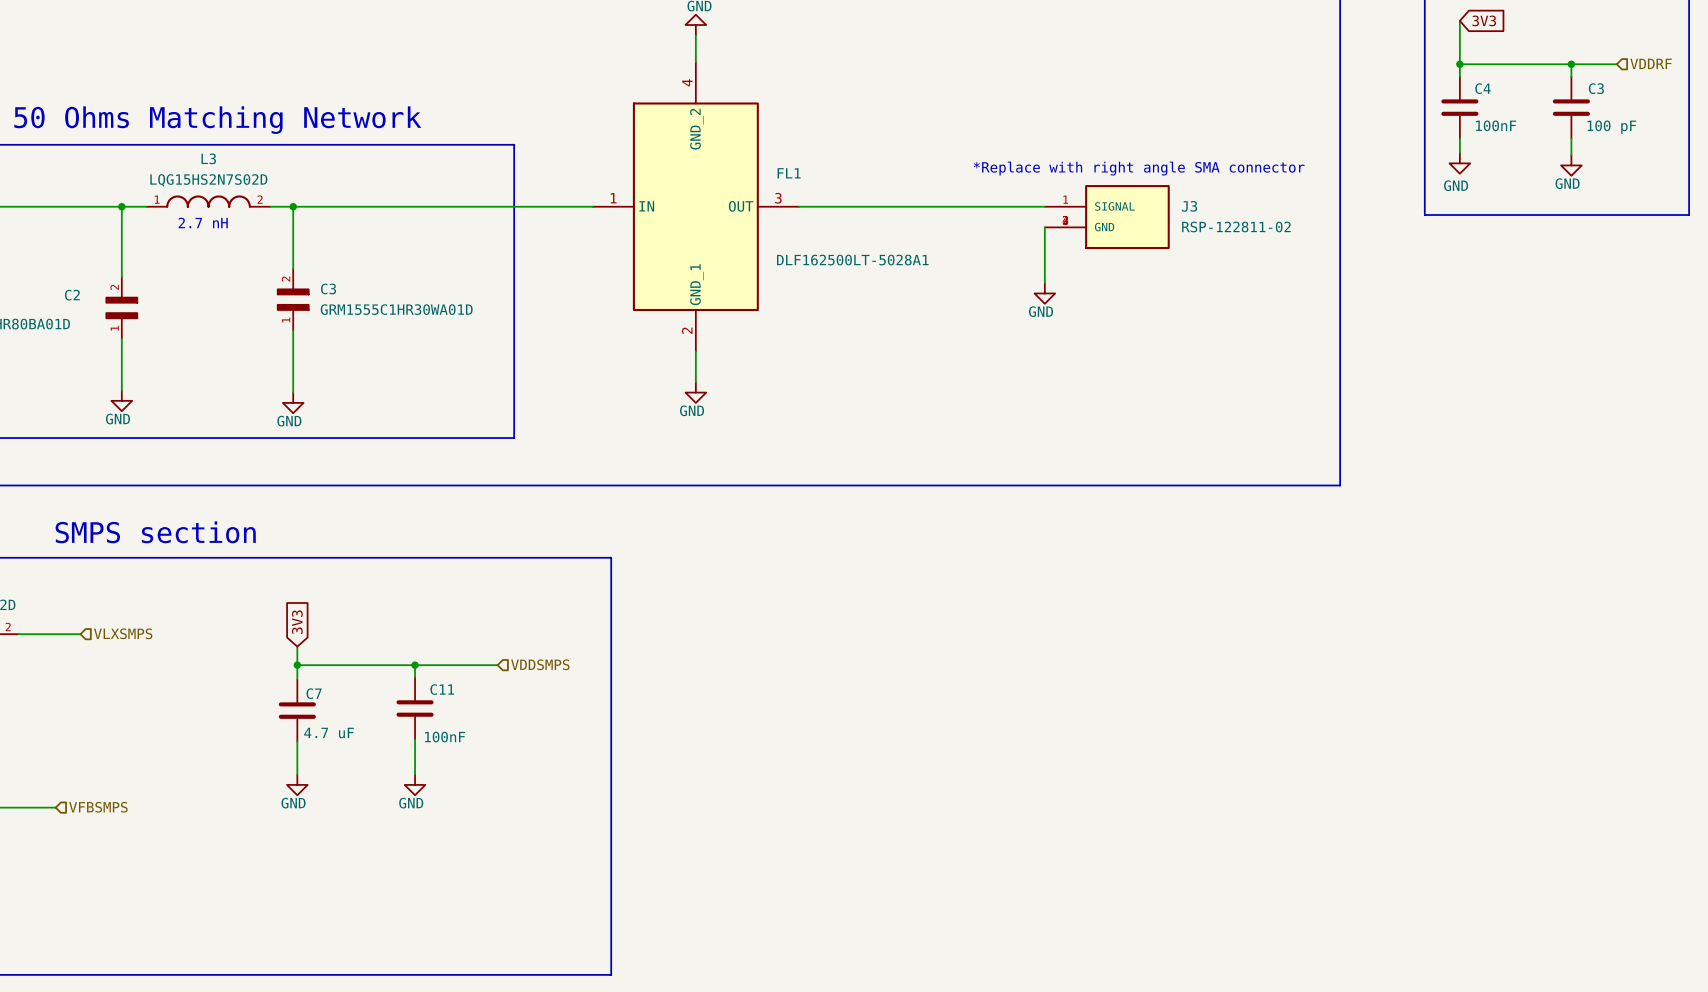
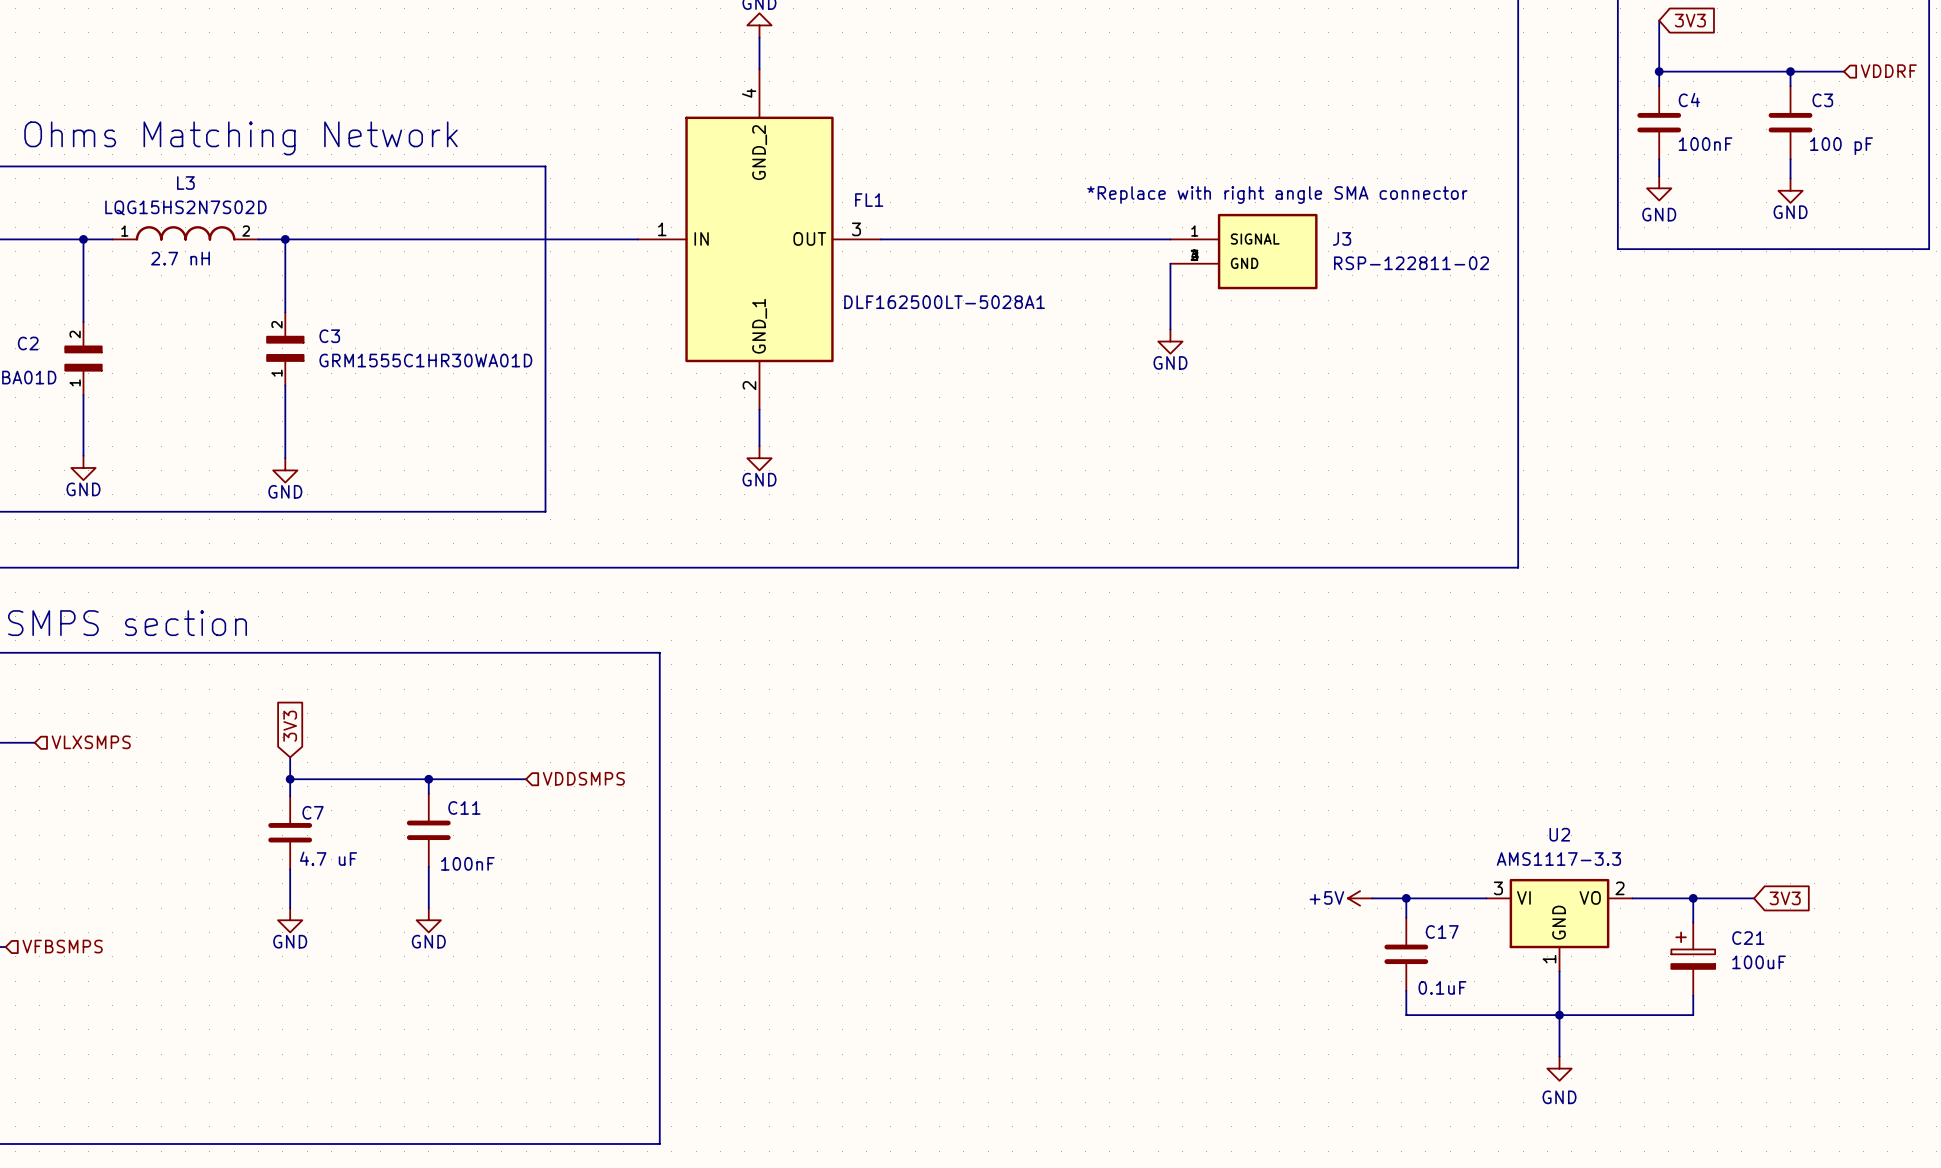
power symbol: none -> +5V (1360, 898)
wire: none -> (1372, 898) (1486, 898)
wire: none -> (1406, 898) (1406, 917)
junction: none -> (1406, 898)
wire: none -> (1632, 898) (1754, 898)
wire: none -> (1693, 898) (1693, 922)
junction: none -> (1693, 898)
global label: none -> 3V3 (1785, 898)
U2: none -> AMS1117-3.3 (1559, 925)
C17: none -> 0.1uF (1406, 954)
C21: none -> 100uF (1693, 959)
wire: none -> (1559, 971) (1559, 1056)
wire: none -> (1406, 990) (1406, 1015) (1693, 1015) (1693, 995)
junction: none -> (1559, 1015)
power symbol: none -> GND (1559, 1068)

